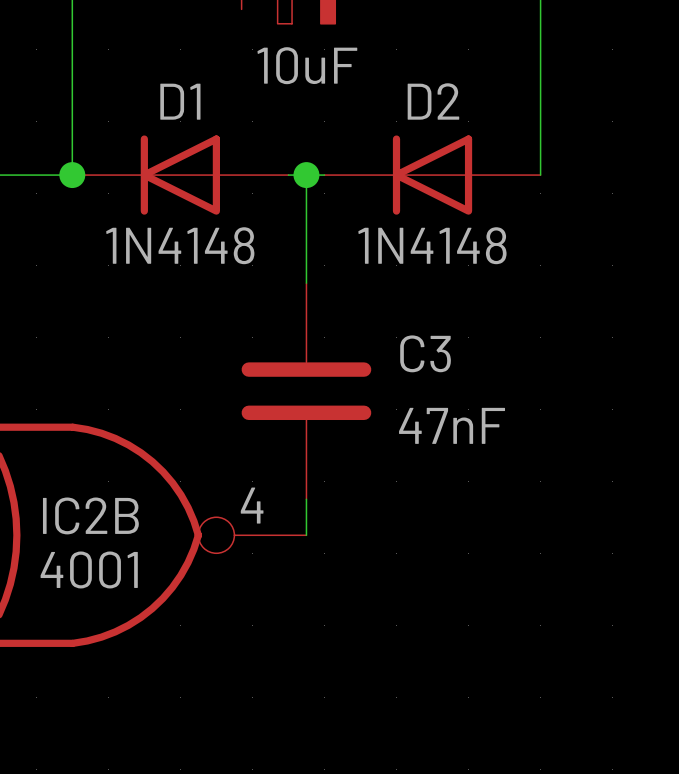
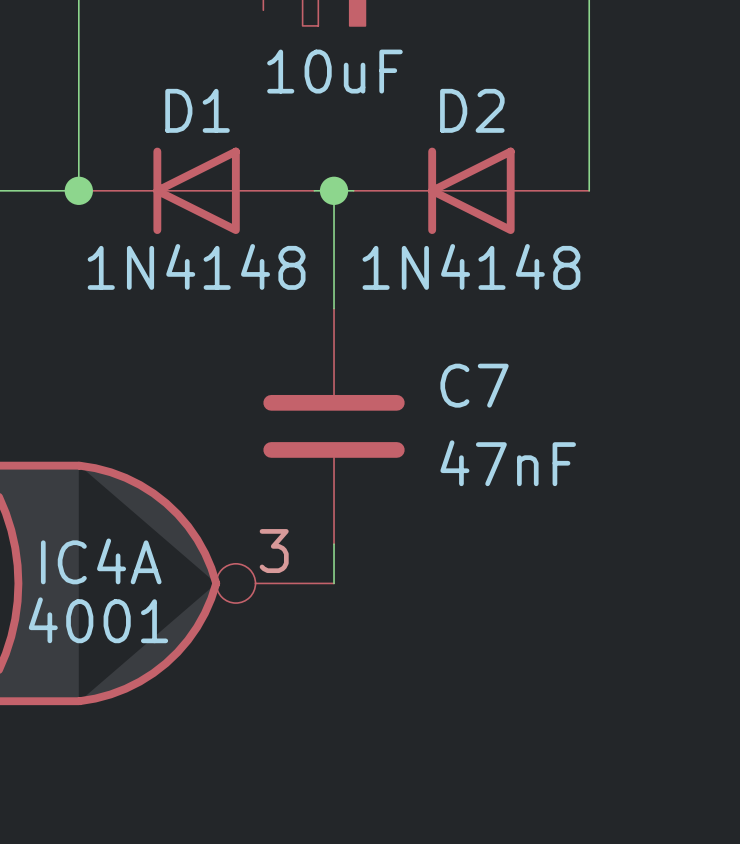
C3 name: C3 (425, 353) -> C7 (474, 385)
IC2B pin number: 4 (252, 505) -> 3 (274, 551)
IC2B name: IC2B (90, 515) -> IC4A (101, 561)

